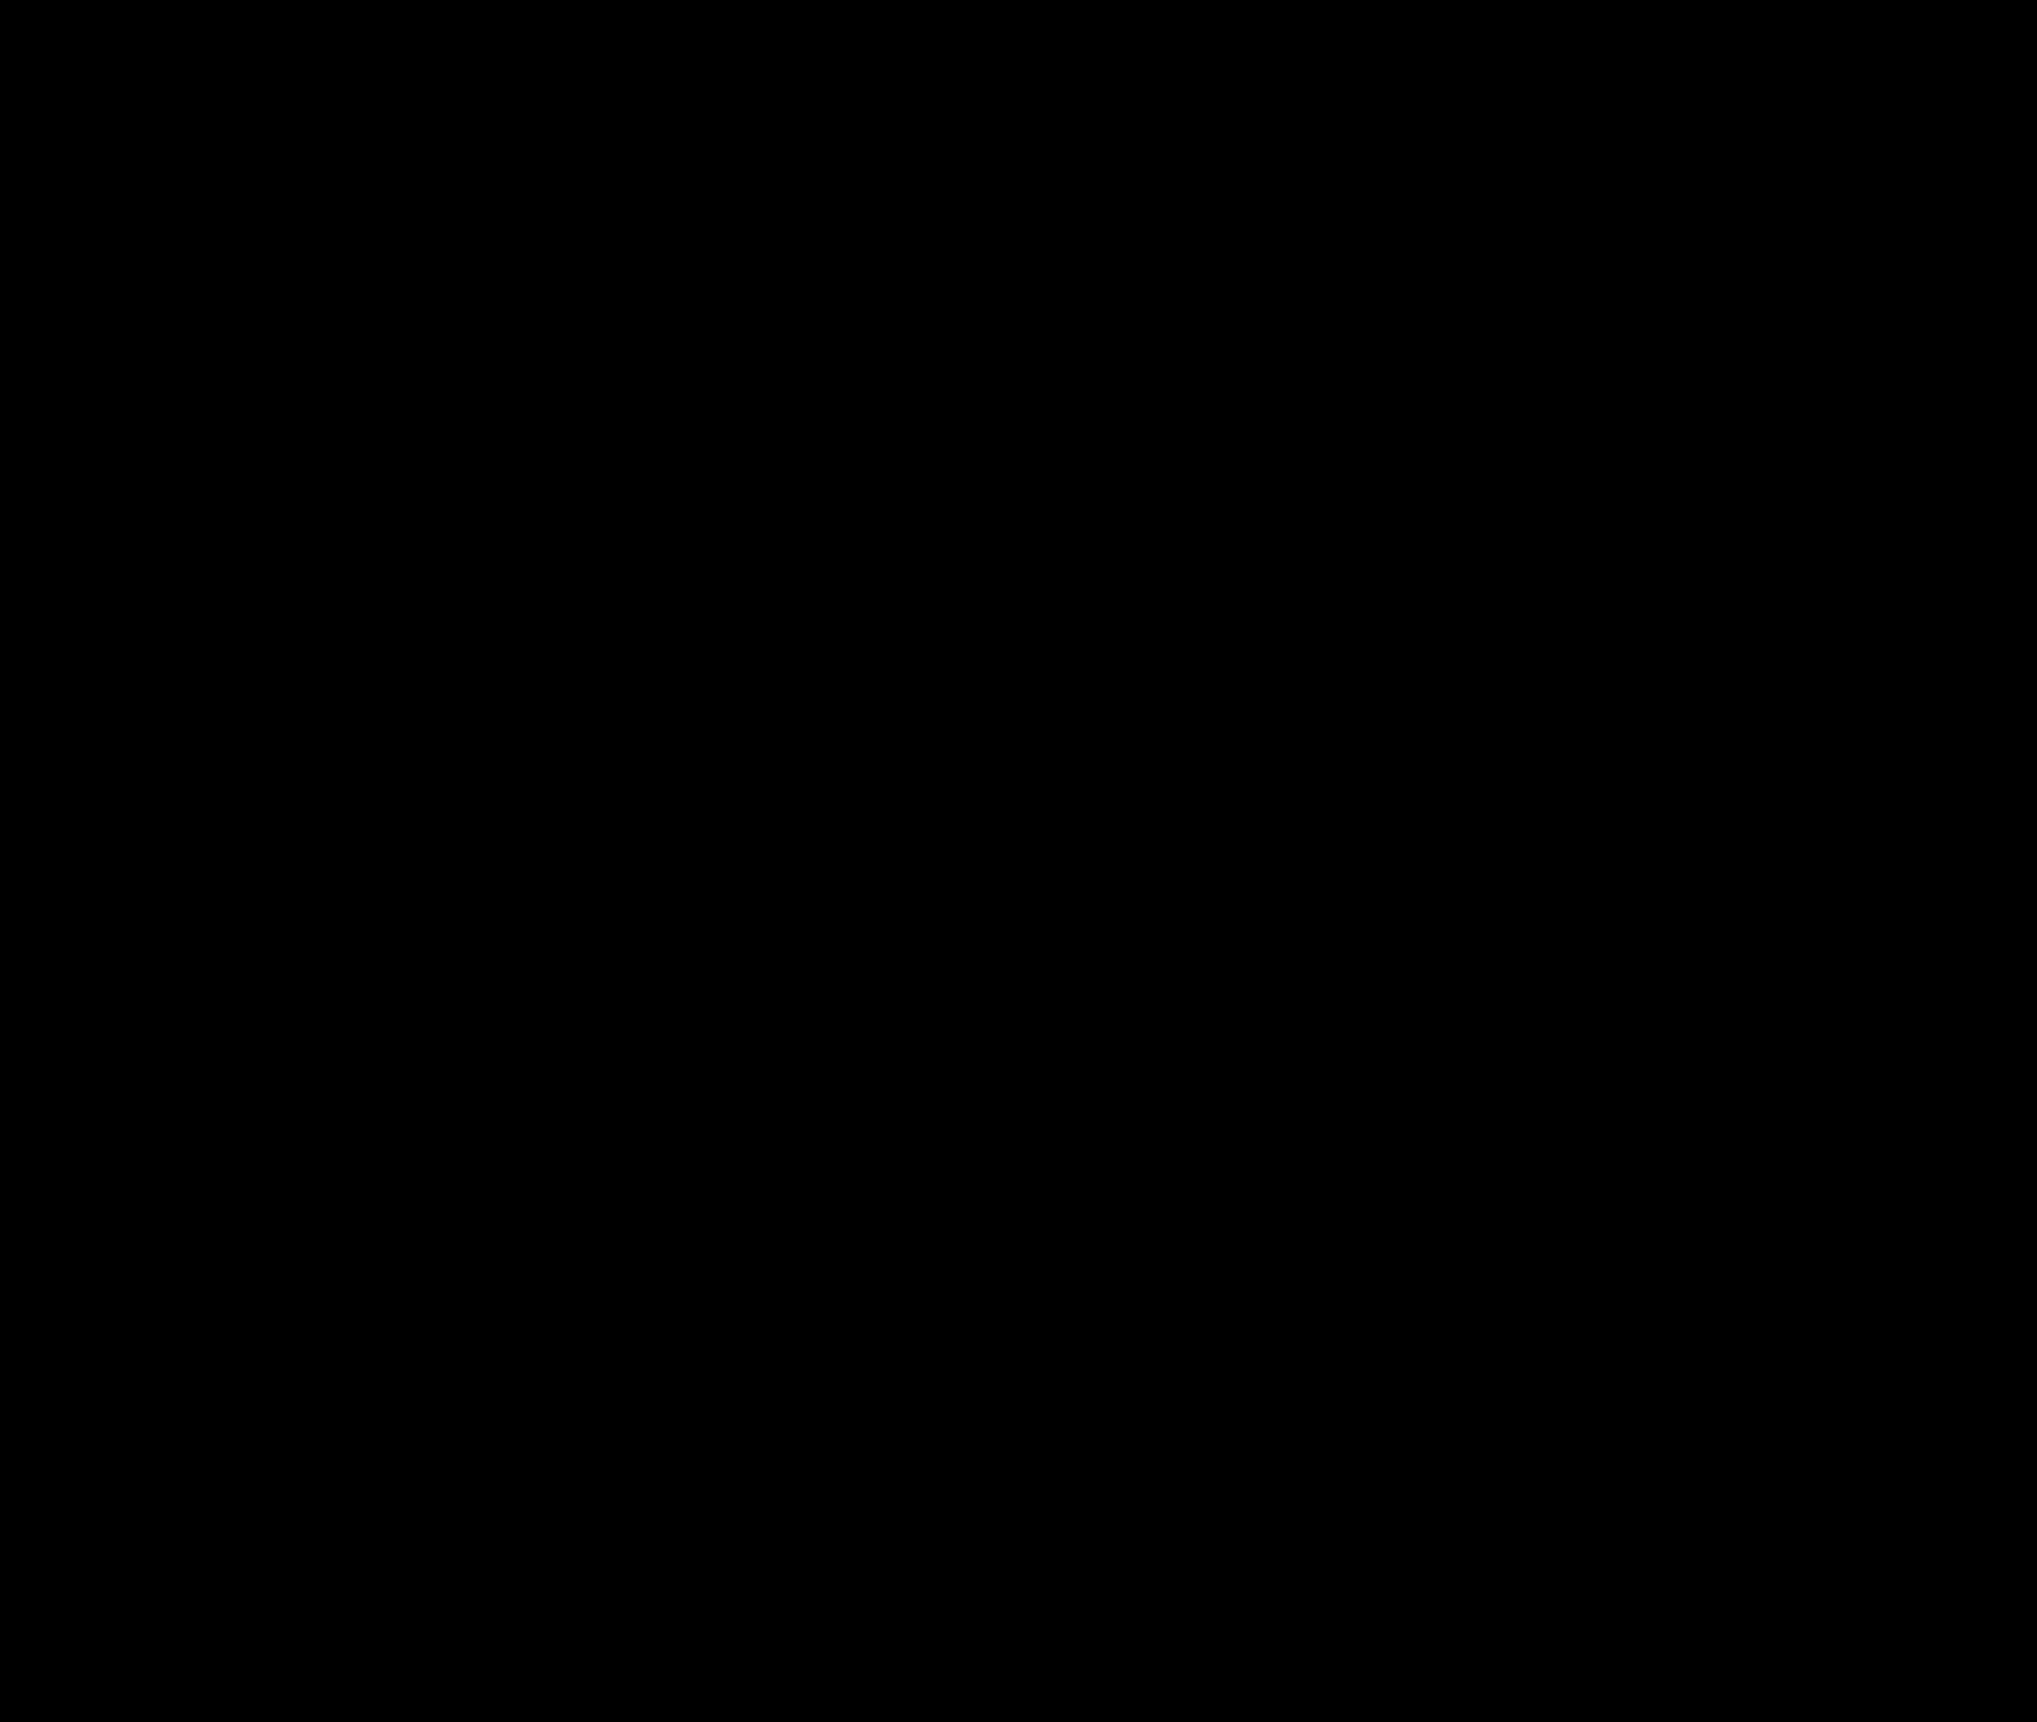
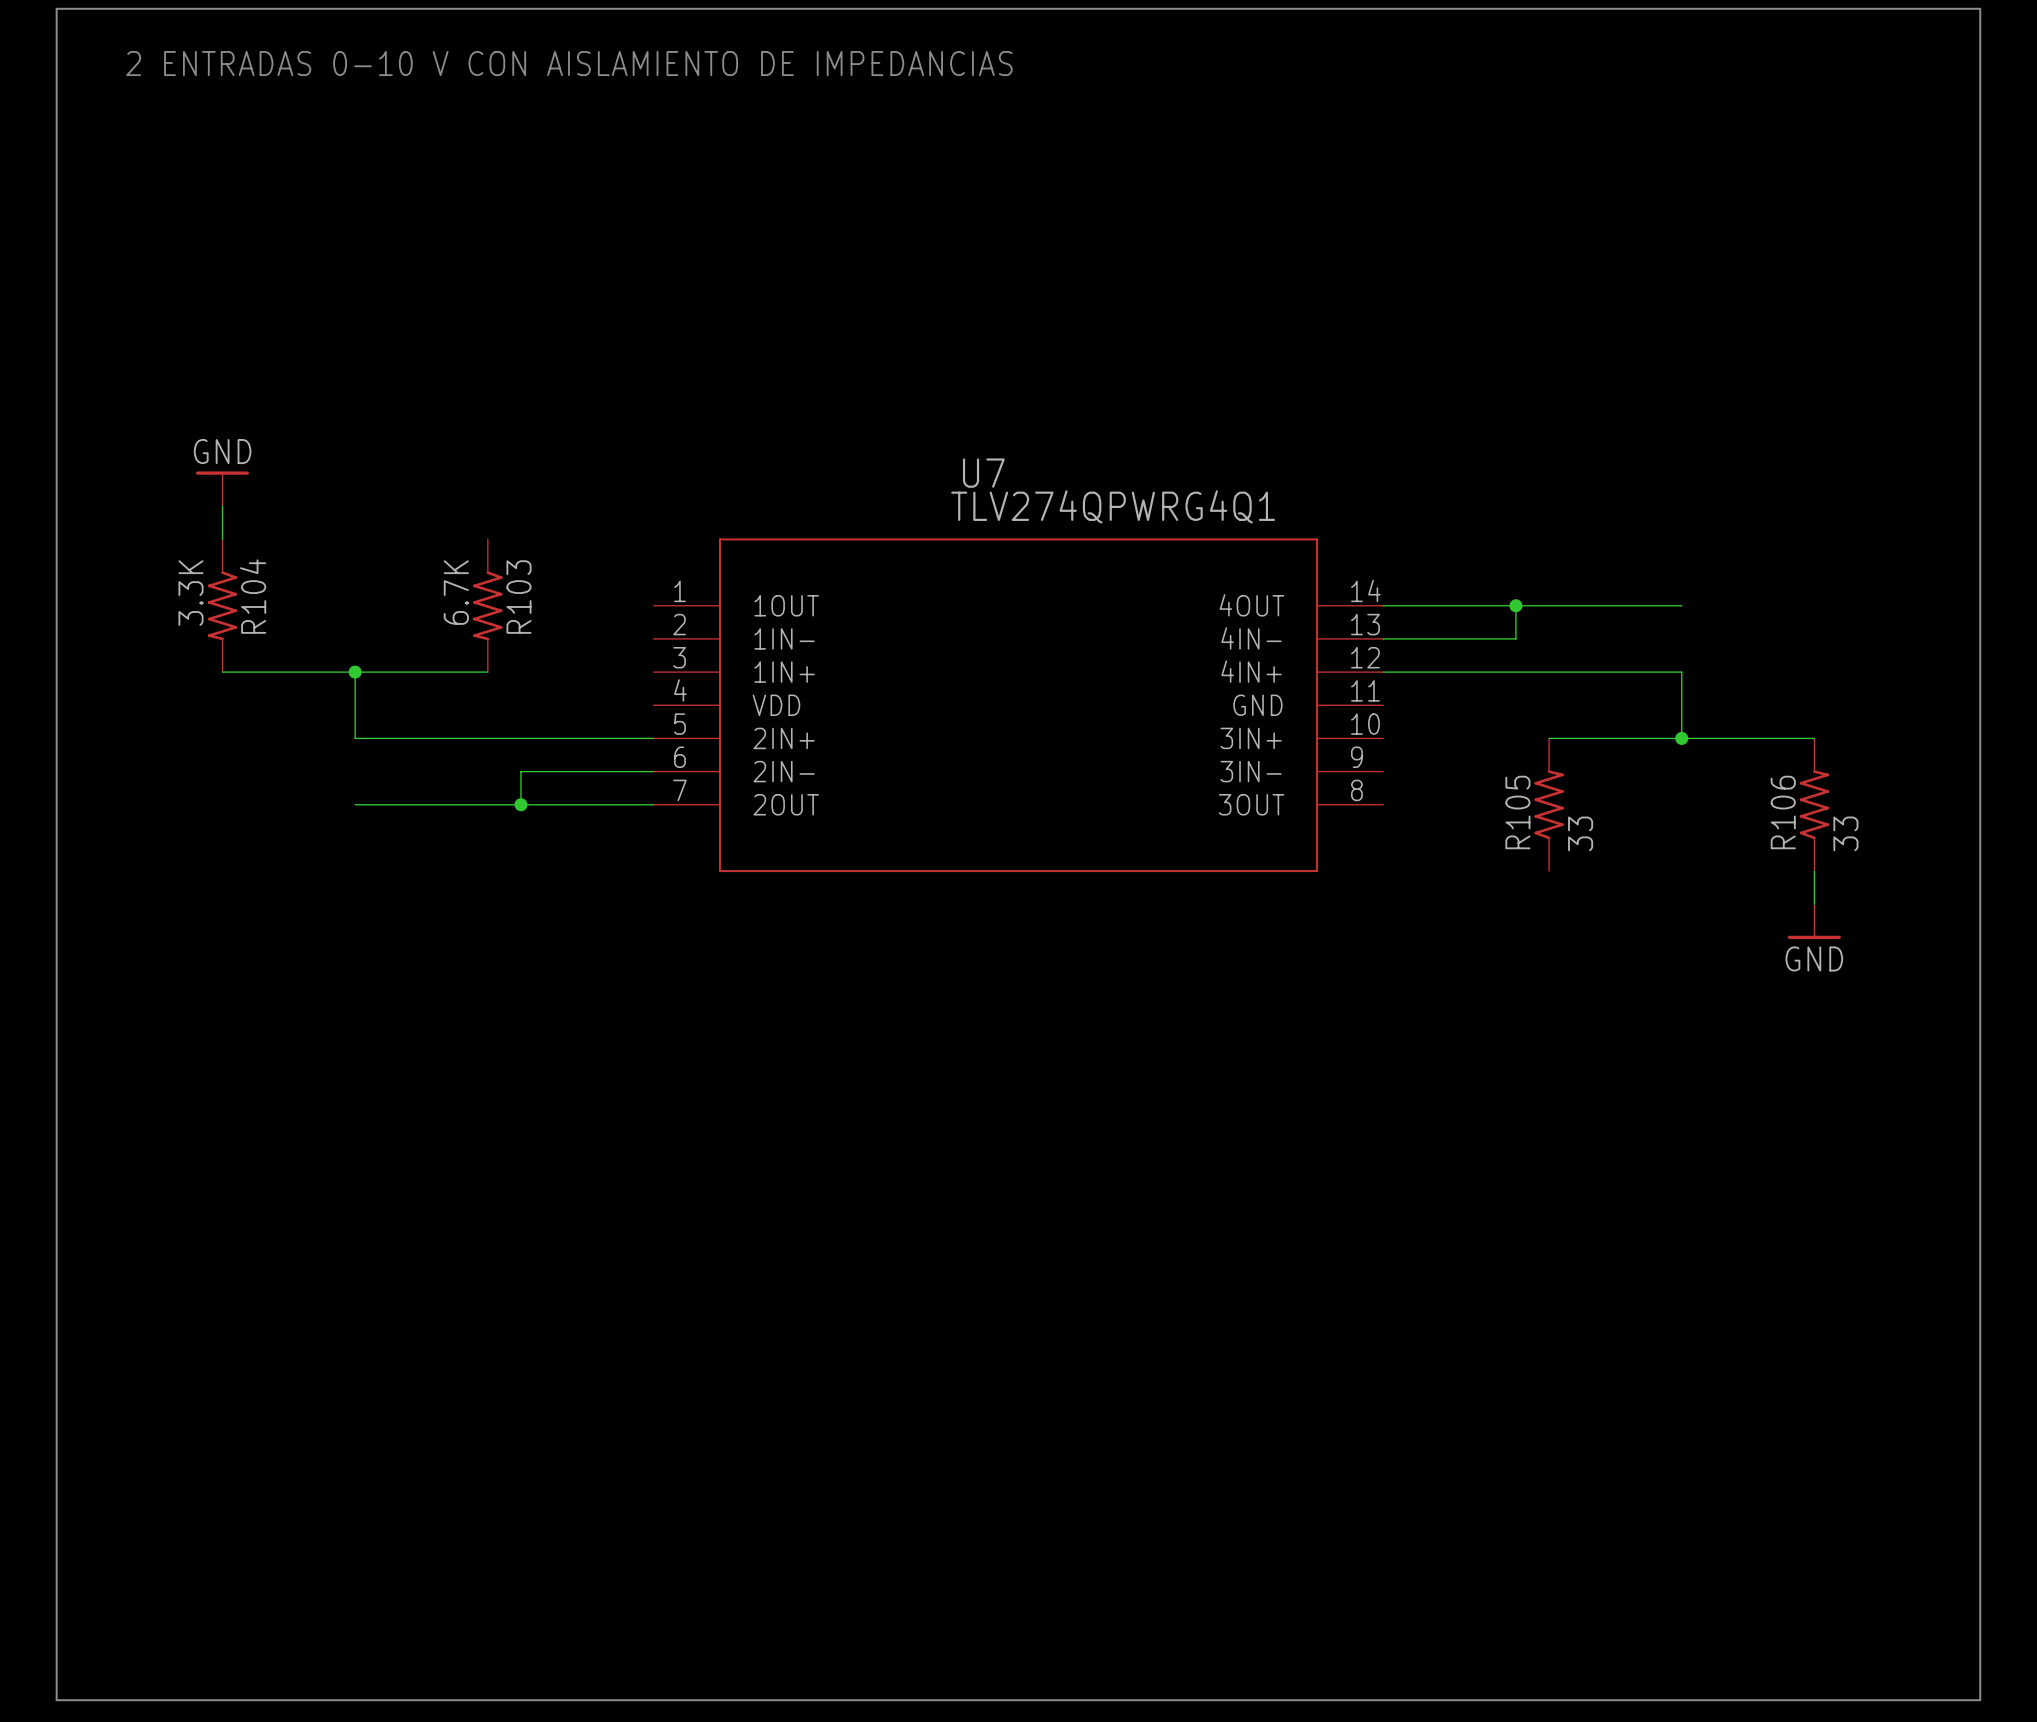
line: none -> (56, 8) (1980, 8) (1980, 1700) (56, 1700) (56, 8)
text: none -> 2 ENTRADAS 0-10 V CON AISLAMIENTO DE IMPEDANCIAS (569, 63)
power symbol: none -> GND (222, 488)
wire: none -> (222, 506) (222, 539)
R104: none -> 3.3K (222, 605)
R103: none -> 6.7K (487, 605)
wire: none -> (1383, 605) (1681, 605)
wire: none -> (1515, 605) (1515, 638) (1383, 638)
junction: none -> (1515, 605)
wire: none -> (222, 672) (487, 672)
wire: none -> (355, 672) (355, 738) (653, 738)
junction: none -> (355, 672)
wire: none -> (1383, 672) (1681, 672) (1681, 738)
U7: none -> TLV274QPWRG4Q1 (1018, 705)
wire: none -> (1549, 738) (1814, 738)
junction: none -> (1681, 738)
wire: none -> (653, 771) (520, 771) (520, 804)
wire: none -> (355, 804) (653, 804)
junction: none -> (520, 804)
R105: none -> 33 (1549, 804)
R106: none -> 33 (1814, 804)
wire: none -> (1814, 871) (1814, 904)
power symbol: none -> GND (1814, 921)

